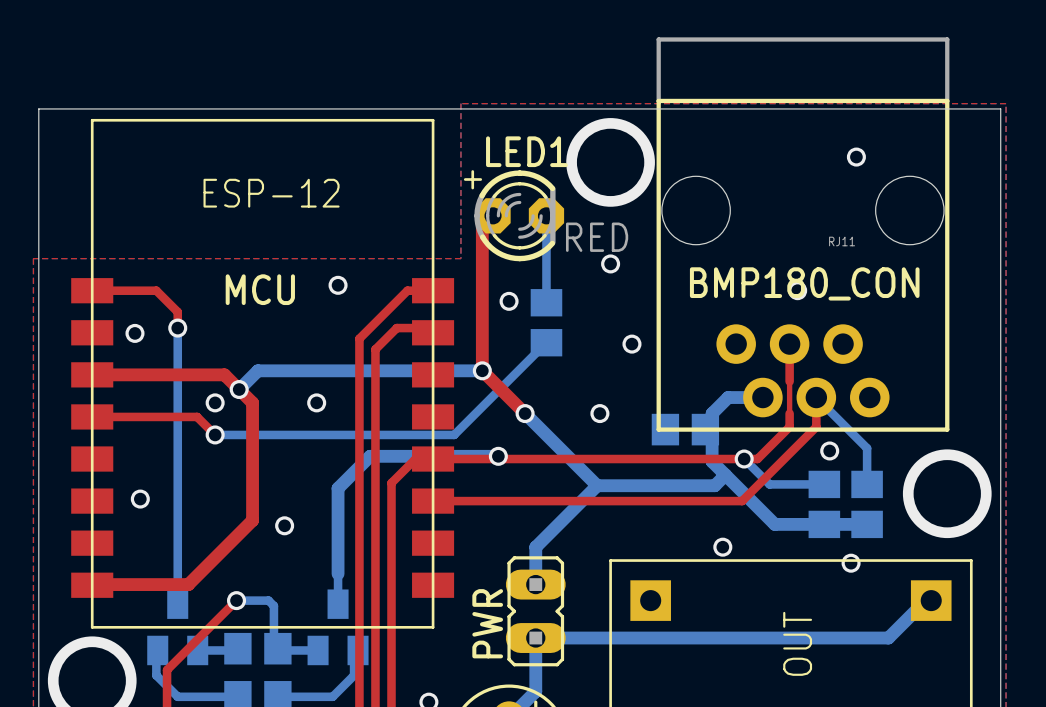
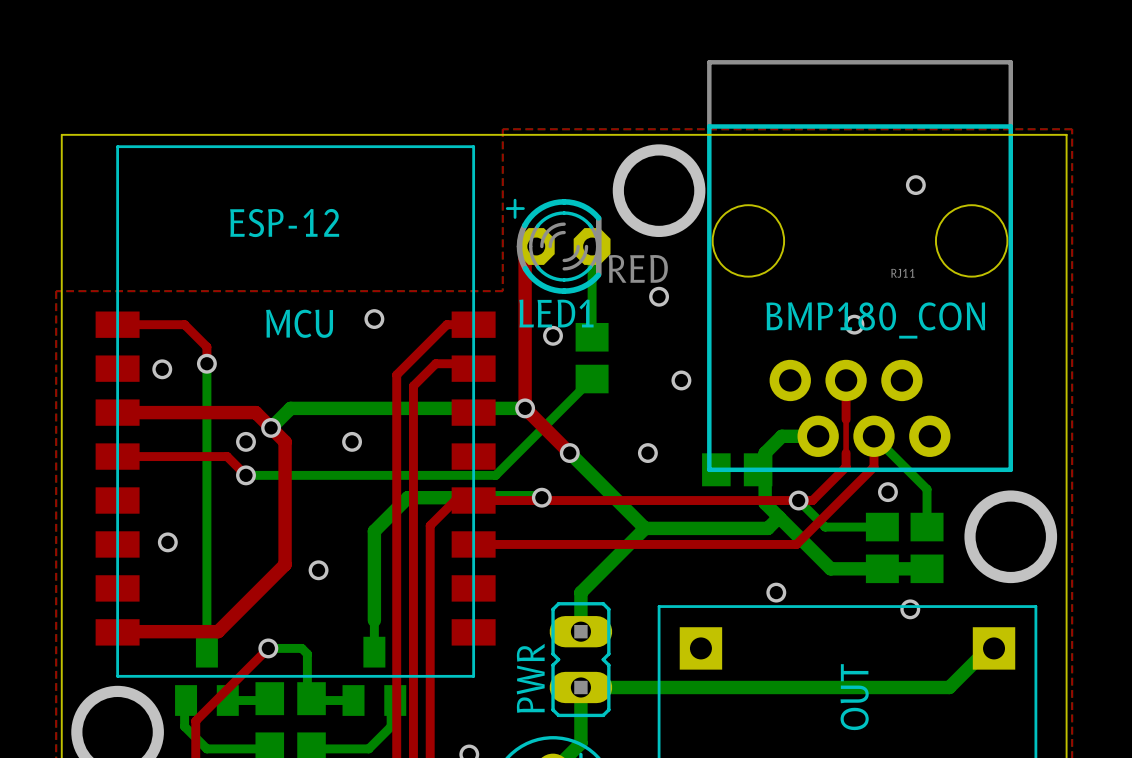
LED1 name position: LED1 (526, 151) -> LED1 (556, 313)

